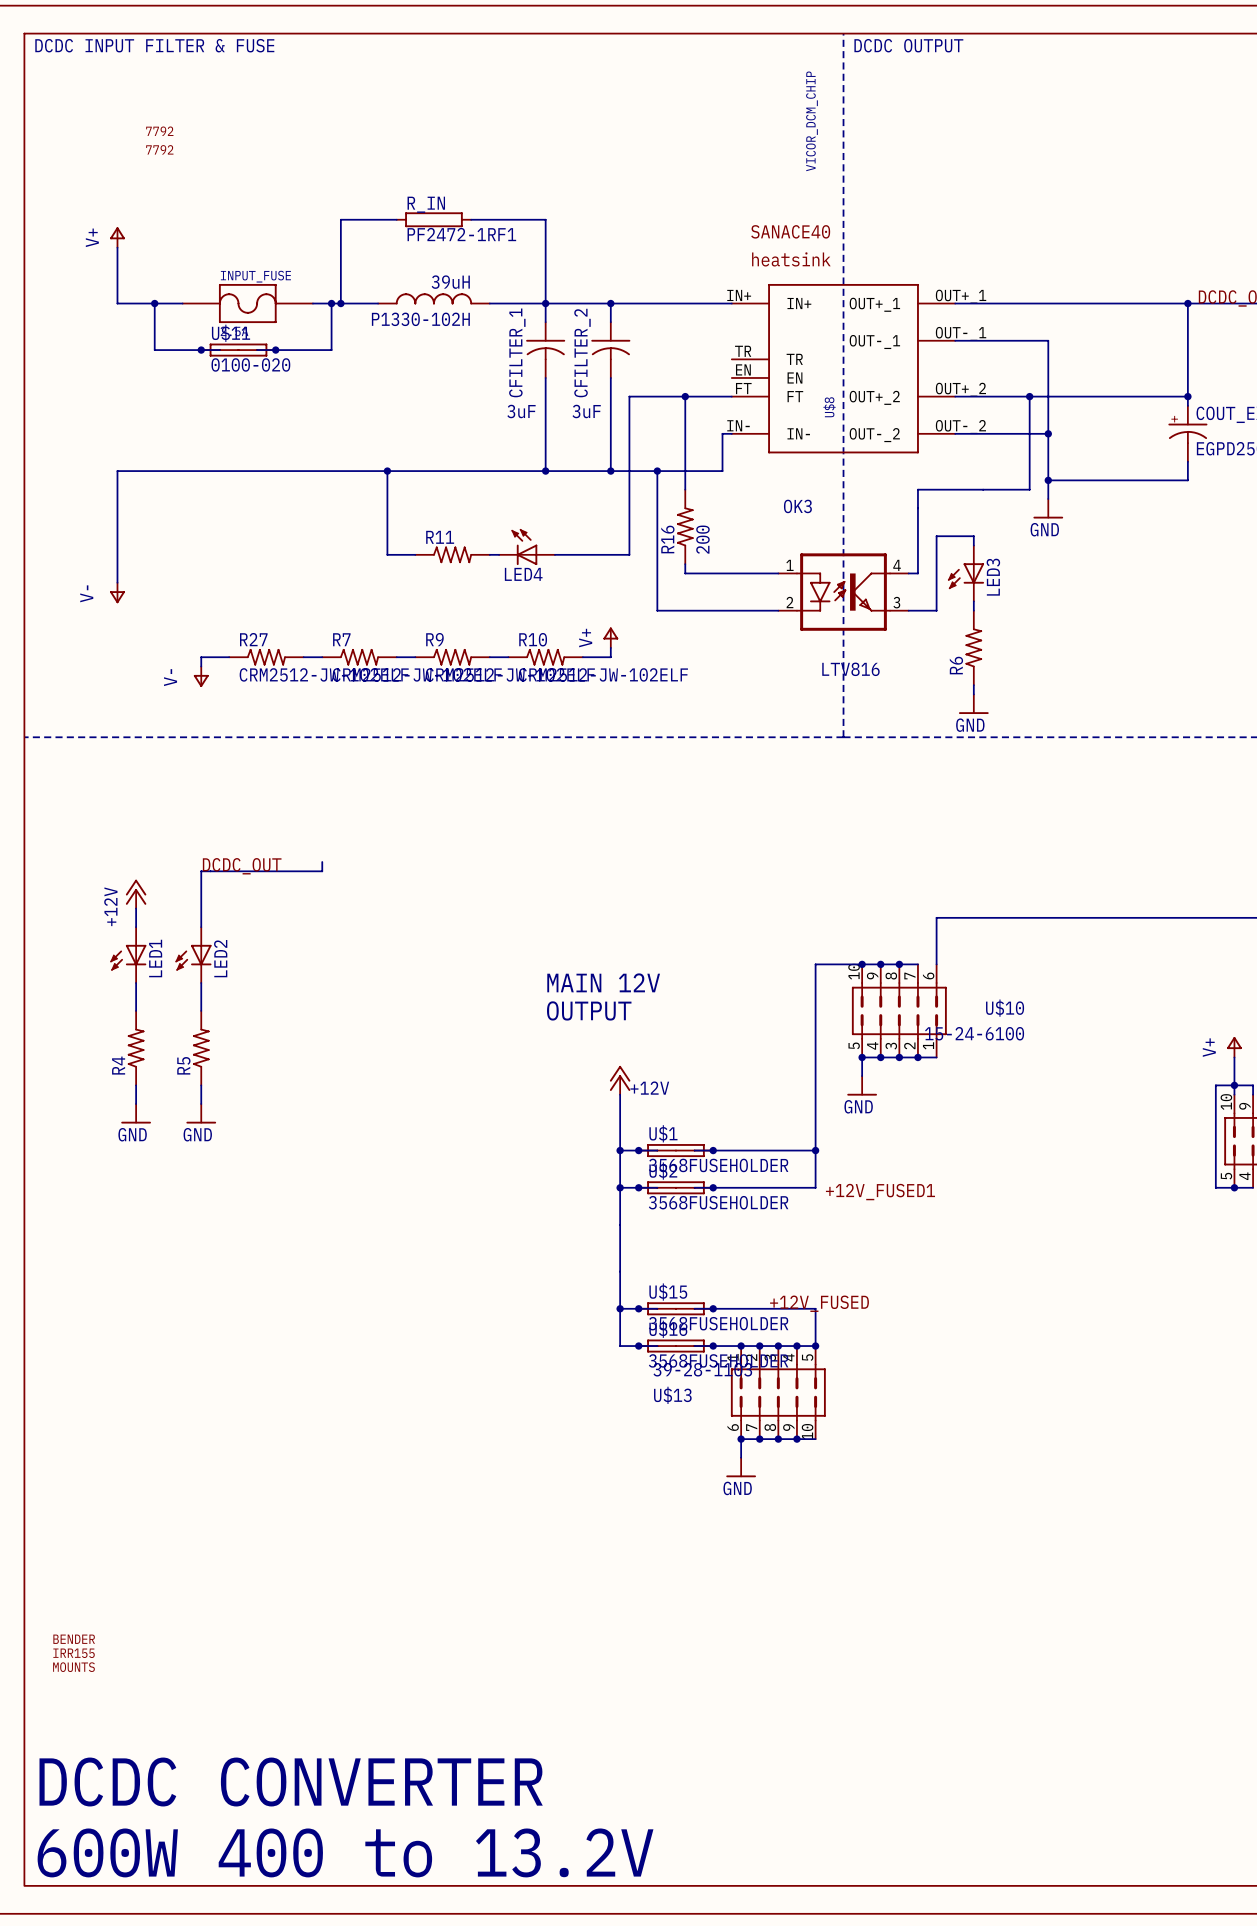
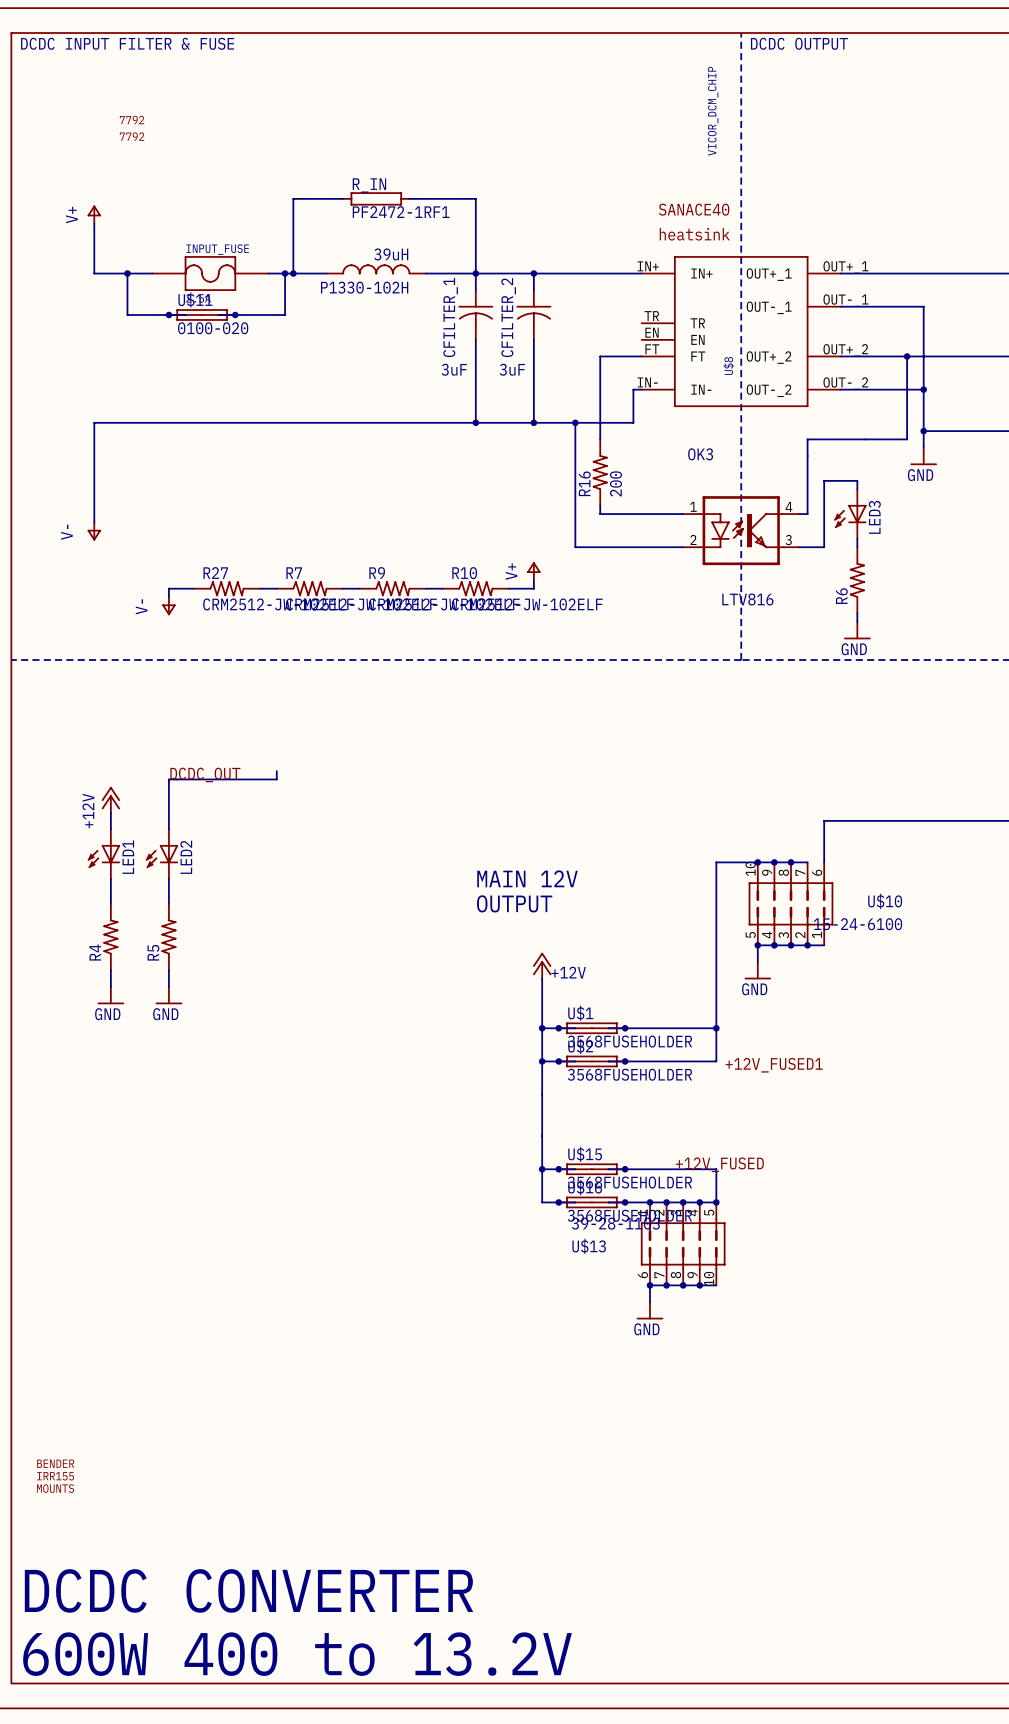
wire: (685, 396) (629, 396) (629, 554) (554, 554) -> none
junction: (685, 396) -> none
wire: (387, 471) (387, 554) (415, 554) -> none
junction: (387, 471) -> none
LED4: (527, 547) -> none
R11: (452, 554) -> none
wire: (489, 554) (499, 554) -> none

